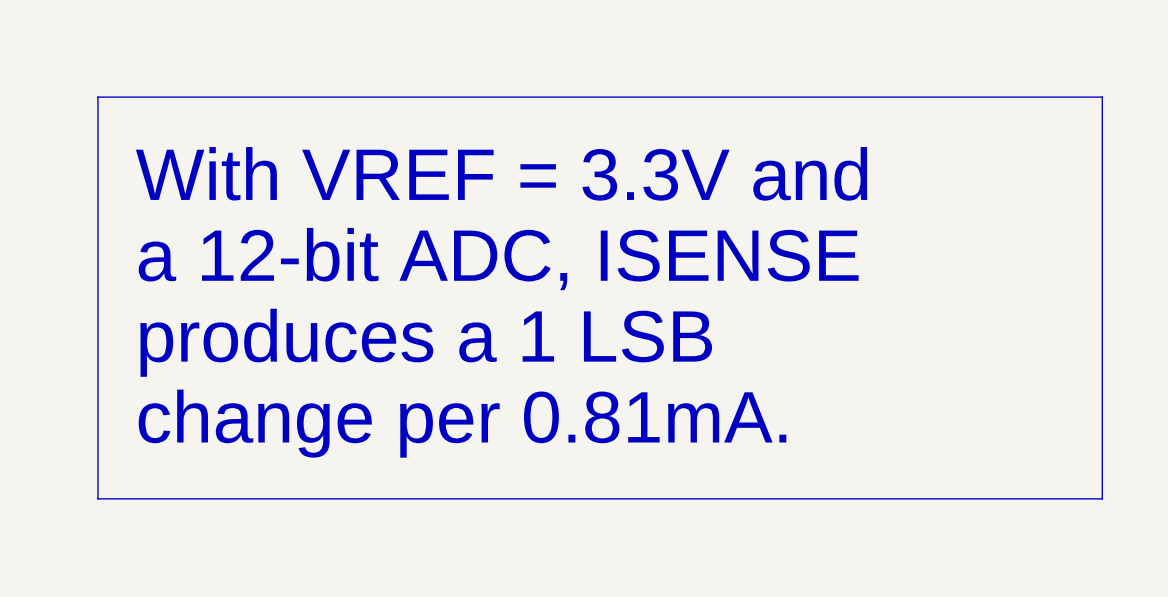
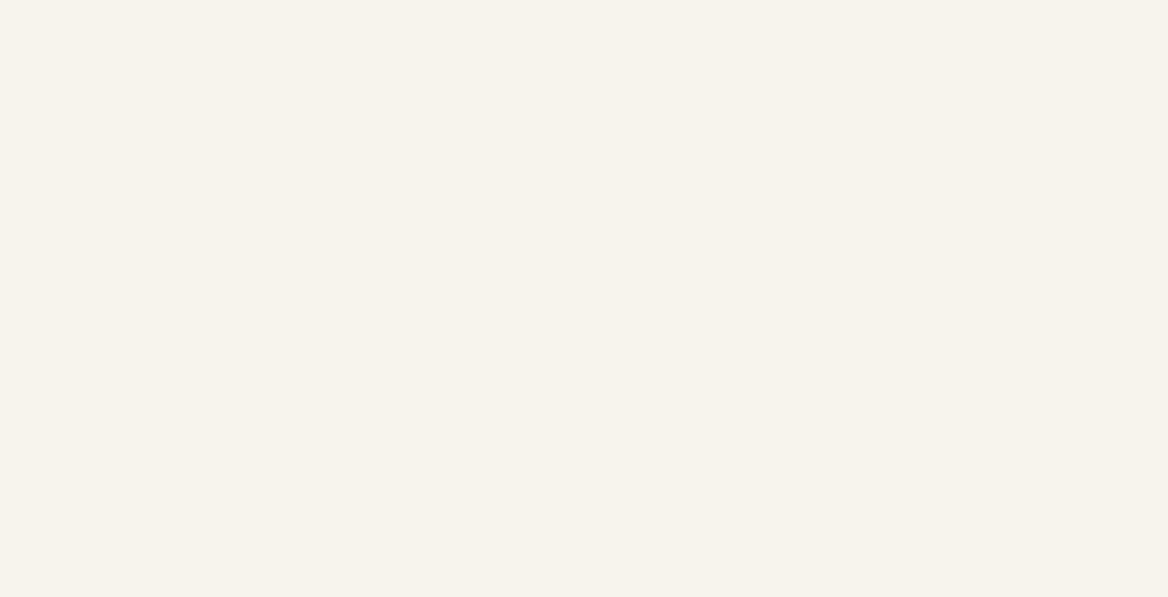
line: (97, 97) (1102, 97) (1102, 498) (97, 498) (97, 97) -> none
text: With VREF = 3.3V and (501, 173) -> none
text: a 12-bit ADC, ISENSE (498, 259) -> none
text: produces a 1 LSB (426, 342) -> none
text: change per 0.81mA. (462, 423) -> none

